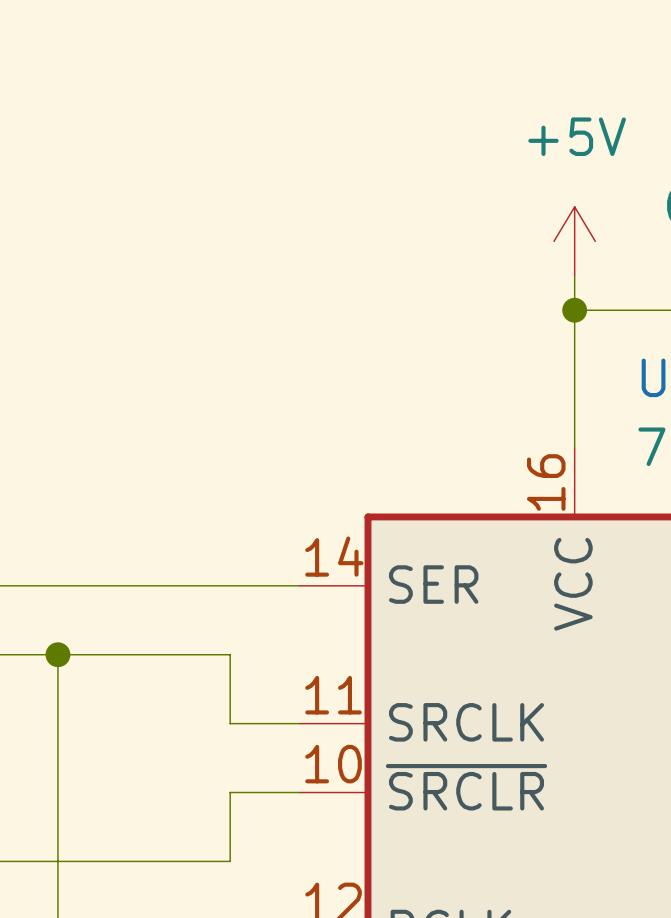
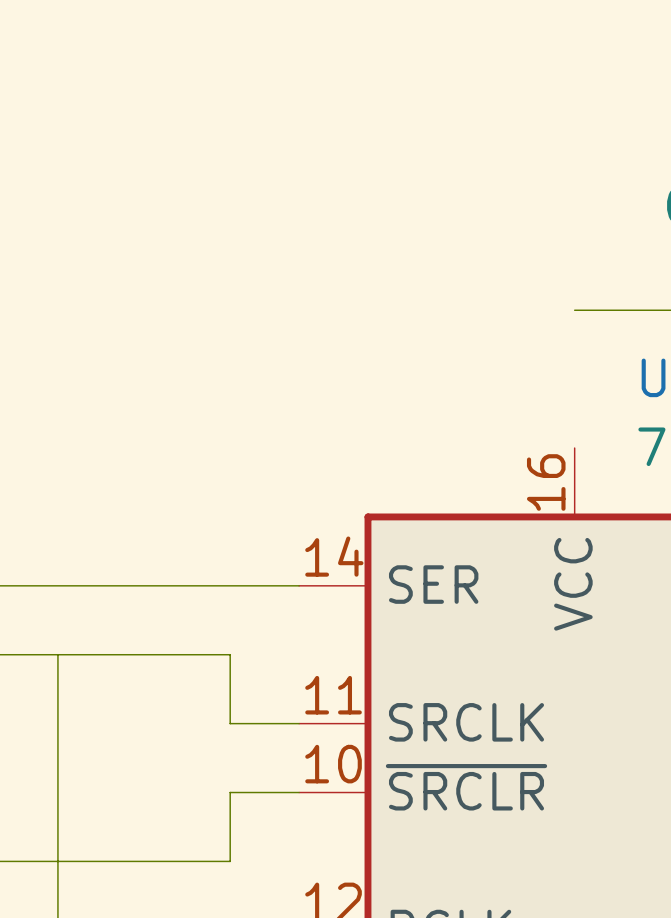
power symbol: +5V (574, 241) -> none
wire: (574, 275) (574, 448) -> none
junction: (574, 310) -> none
junction: (57, 654) -> none

